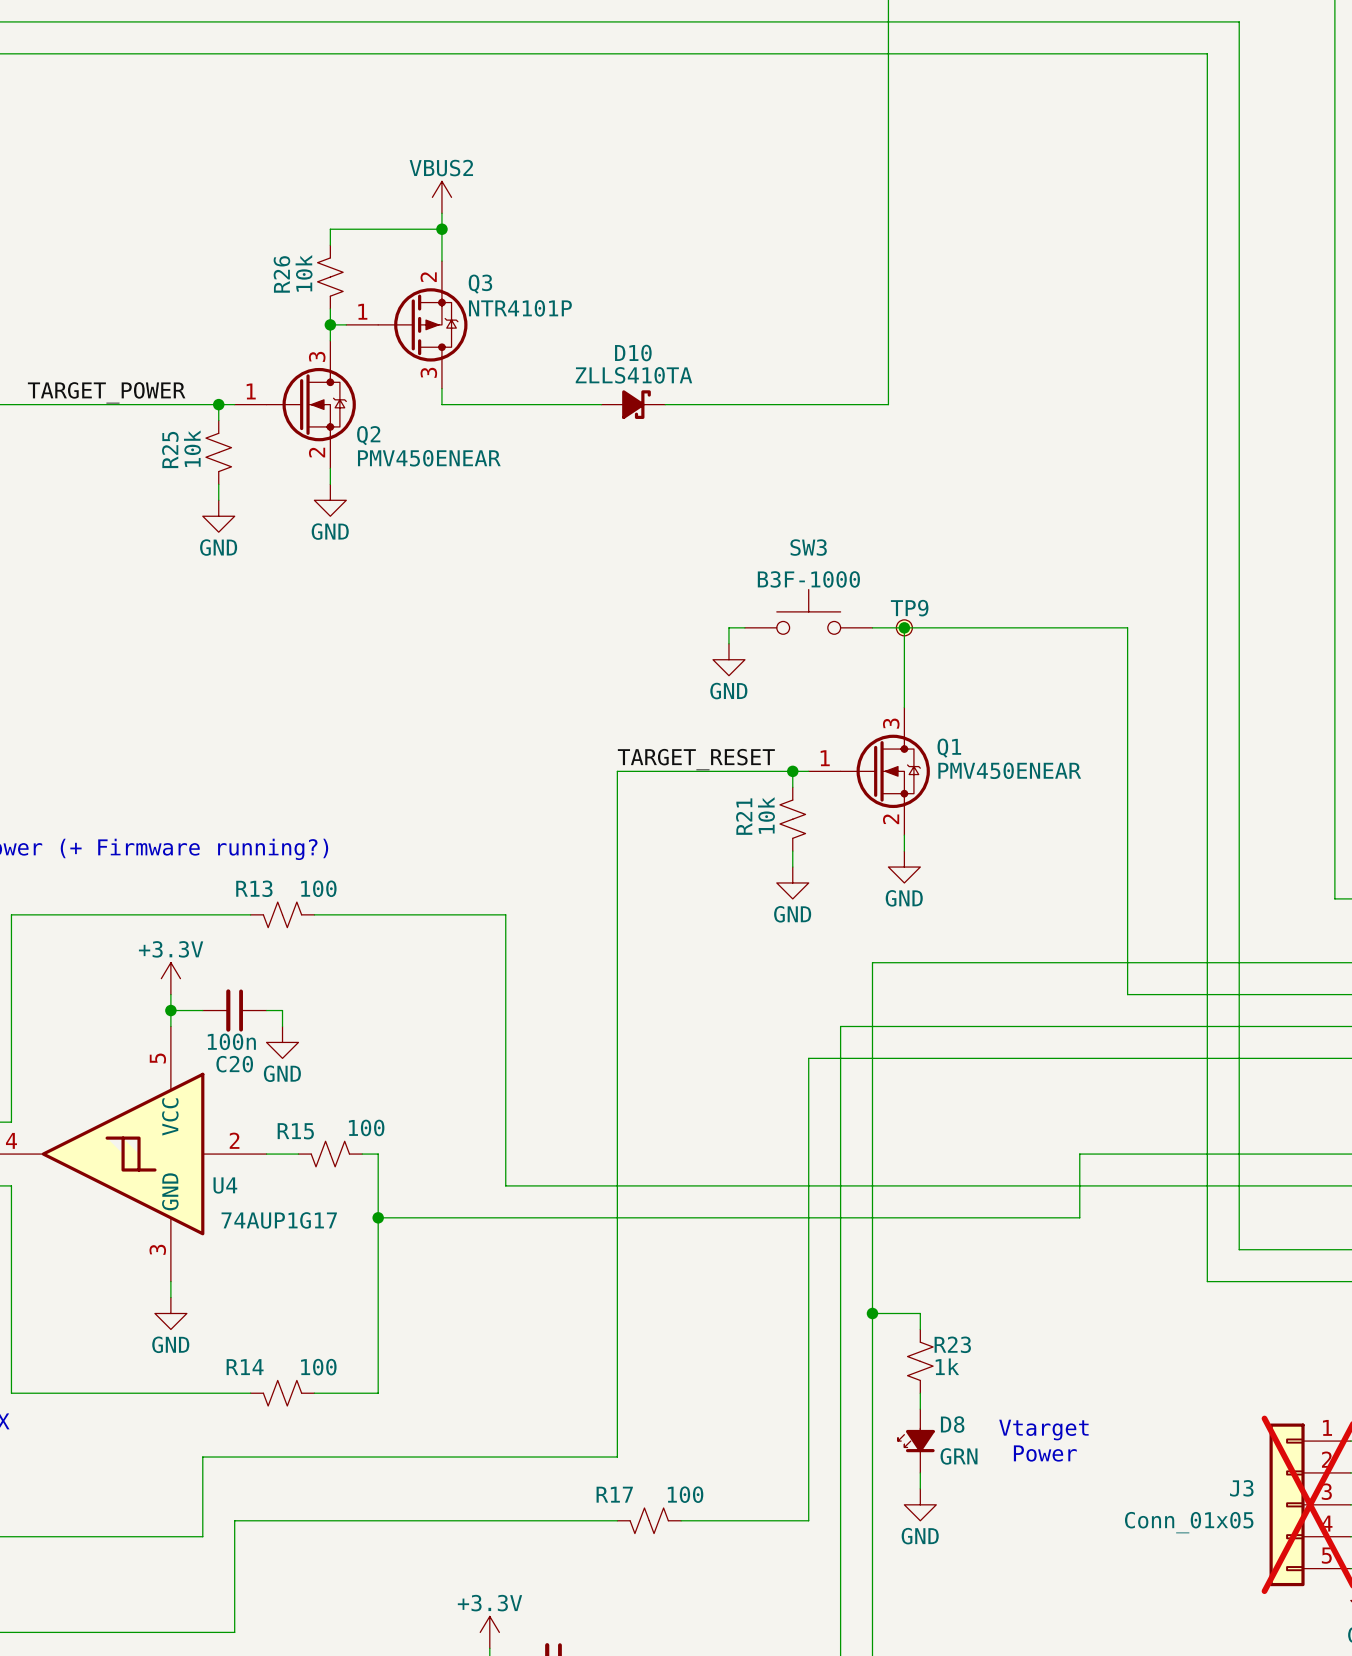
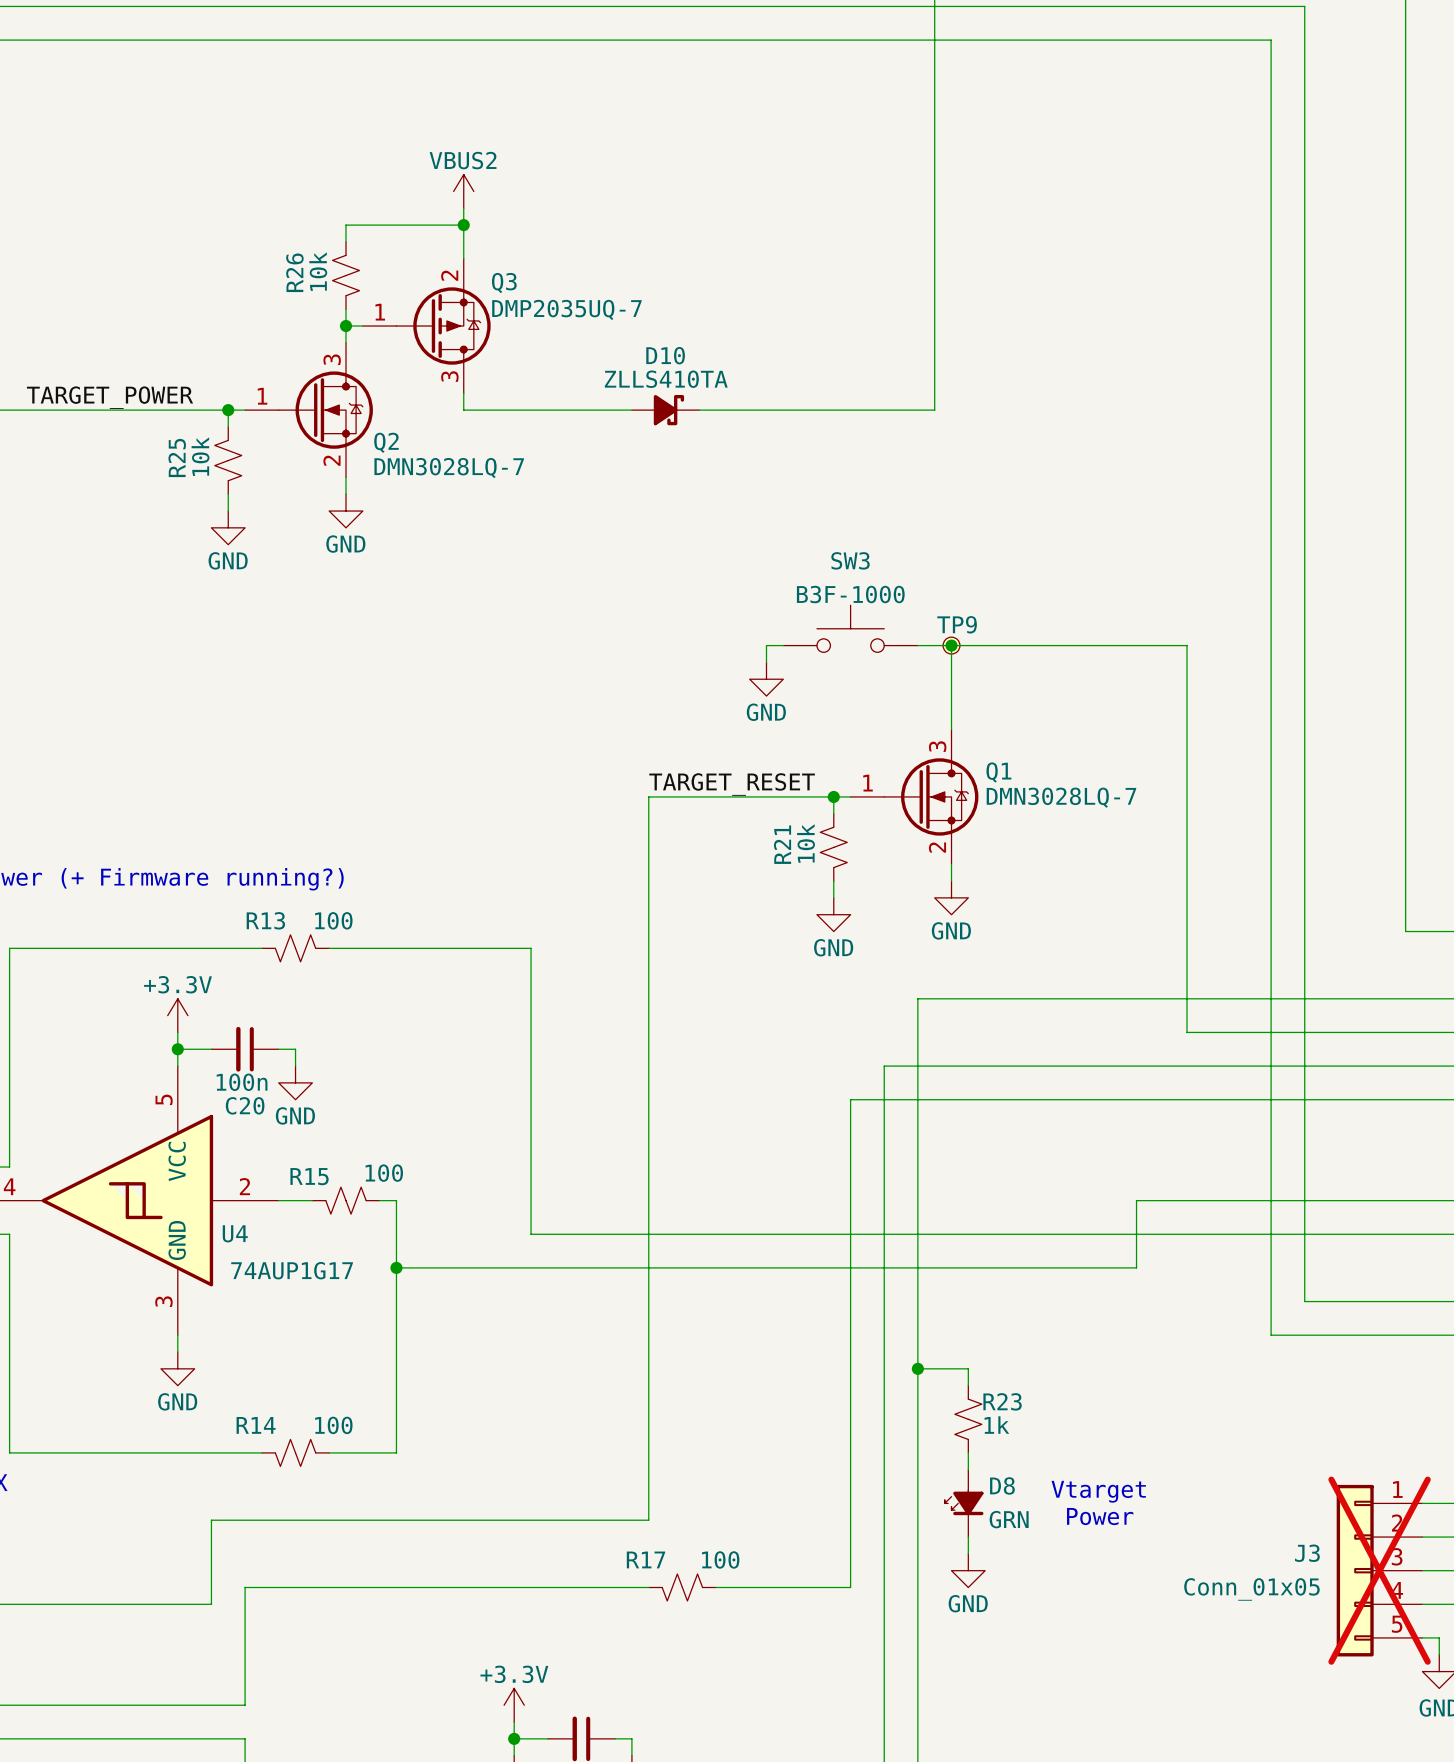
Q3 value: NTR4101P (520, 308) -> DMP2035UQ-7 (566, 309)
Q2 value: PMV450ENEAR (429, 458) -> DMN3028LQ-7 (449, 468)
Q1 value: PMV450ENEAR (1009, 770) -> DMN3028LQ-7 (1061, 797)

